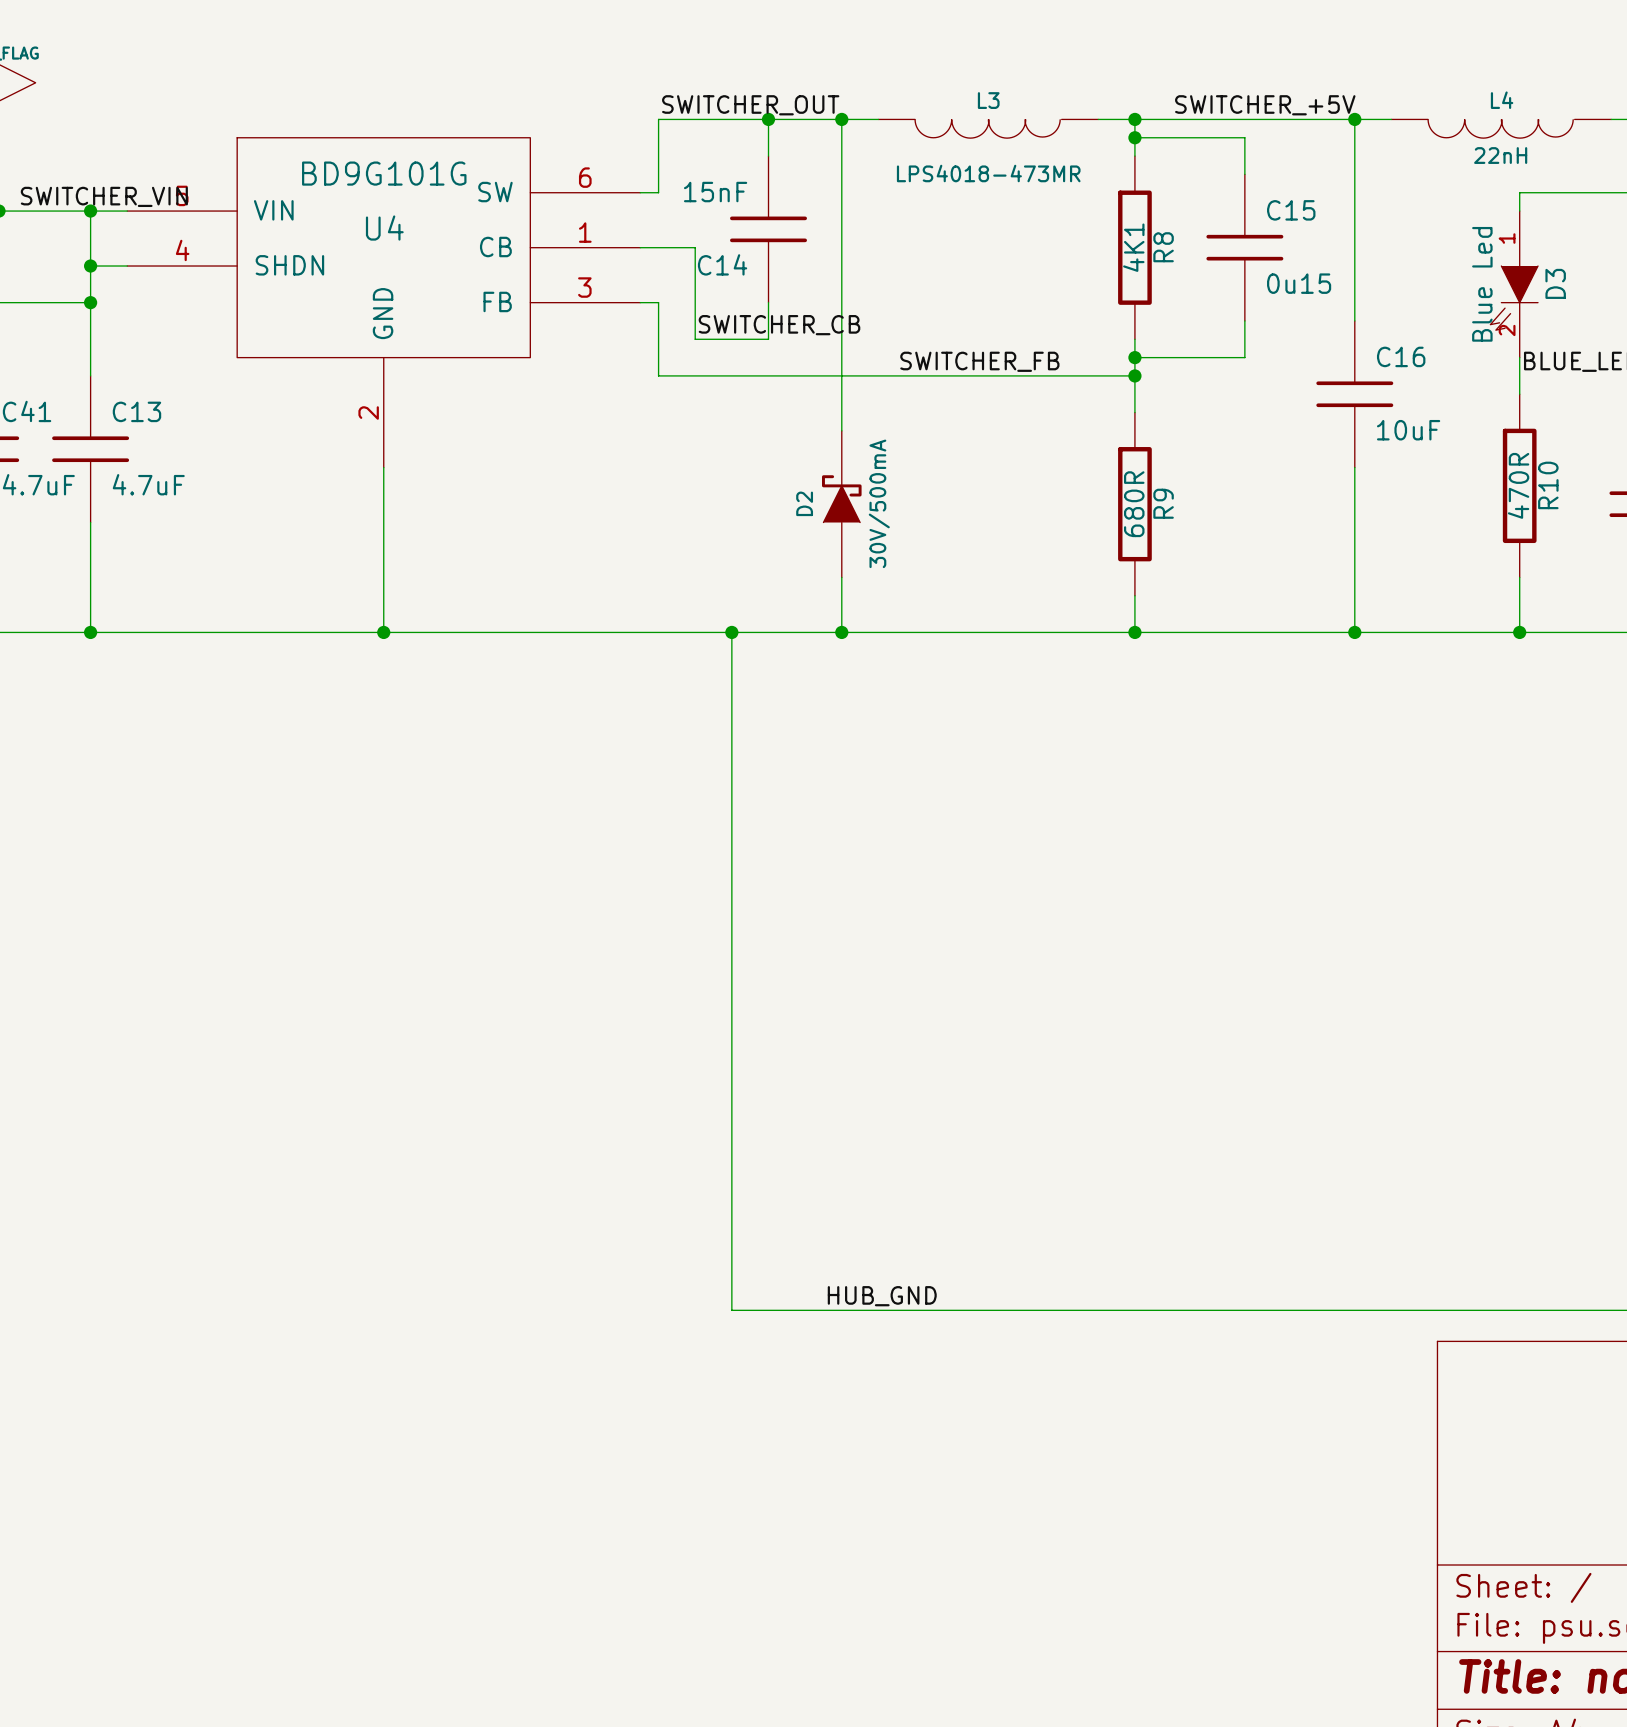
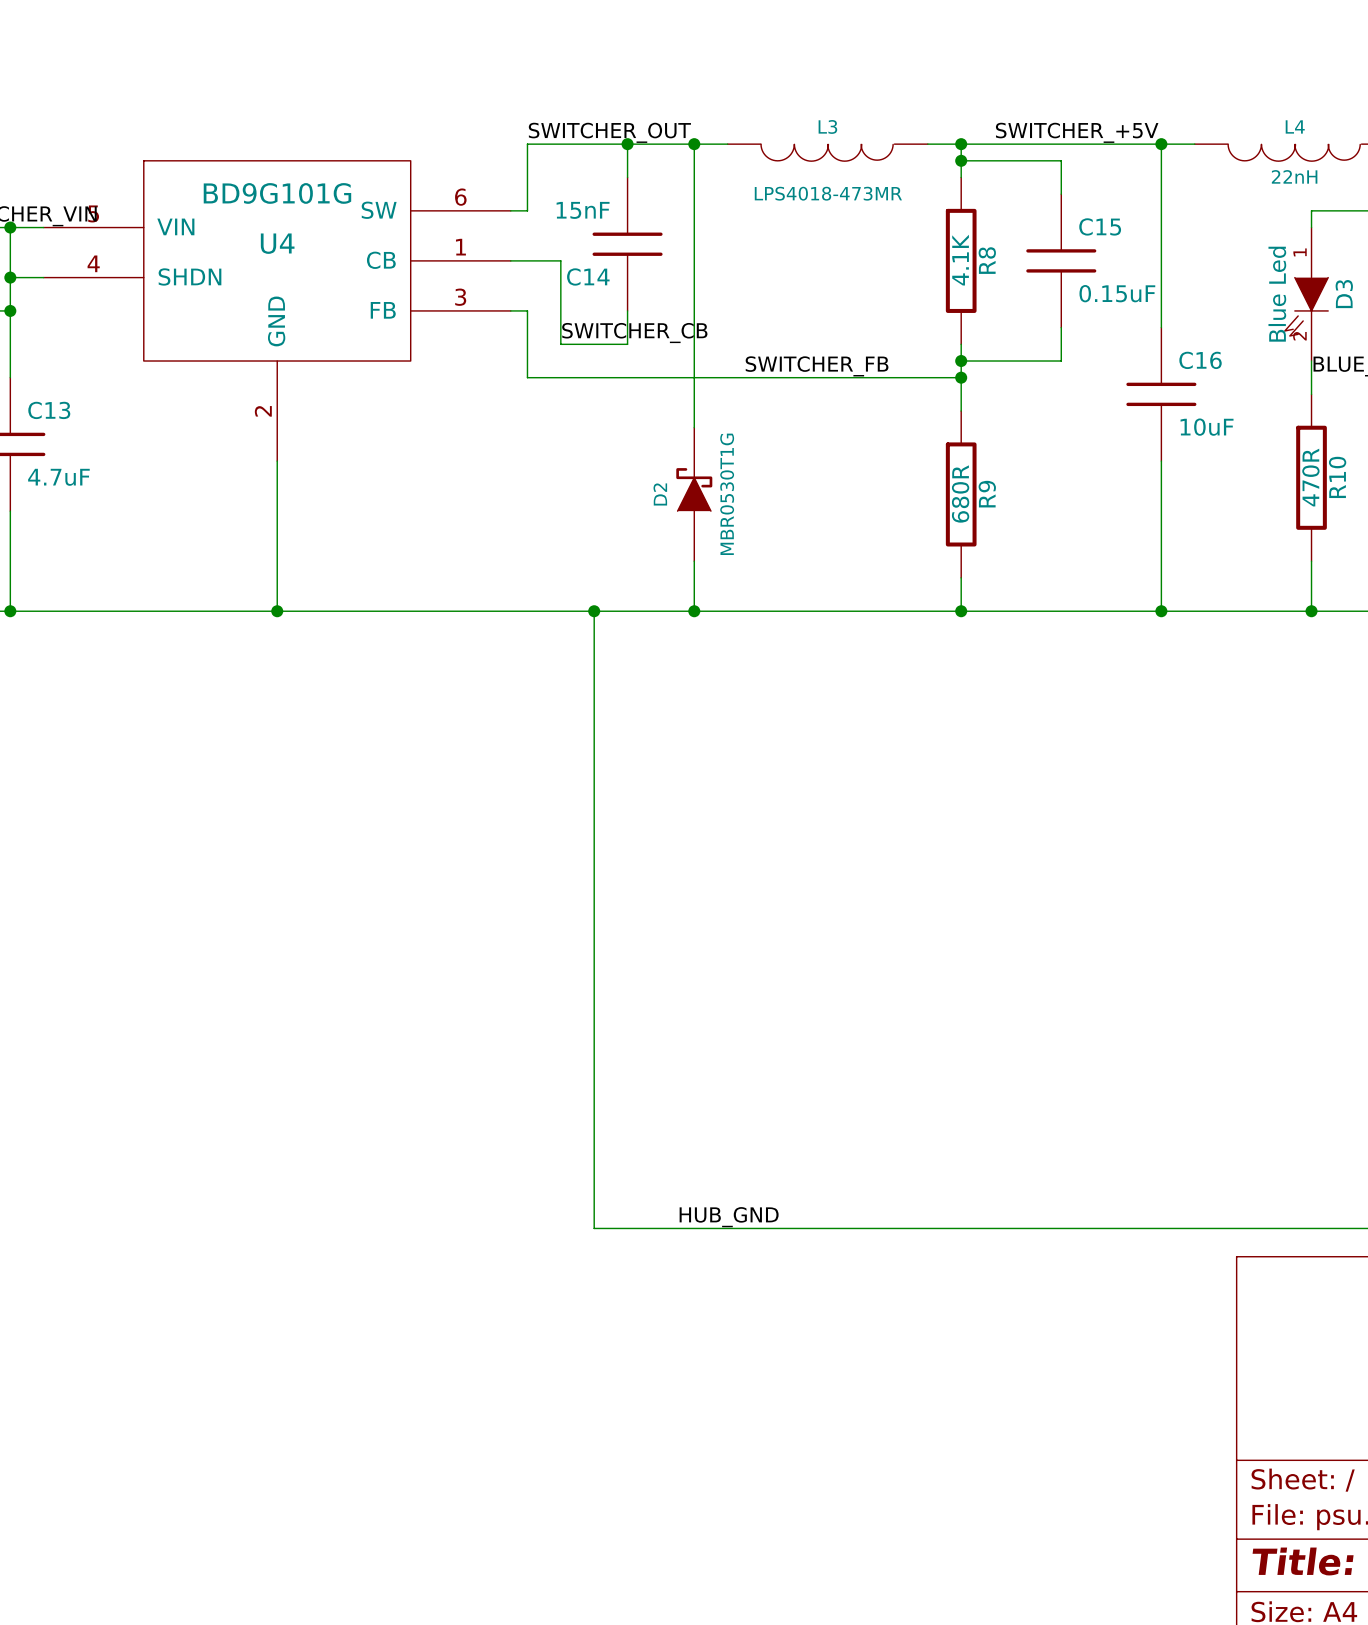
R8 value: 4K1 (1133, 247) -> 4.1K (960, 260)
C15 value: 0u15 (1299, 283) -> 0.15uF (1117, 293)
D2 value: 30V/500mA (879, 503) -> MBR0530T1G (727, 494)

